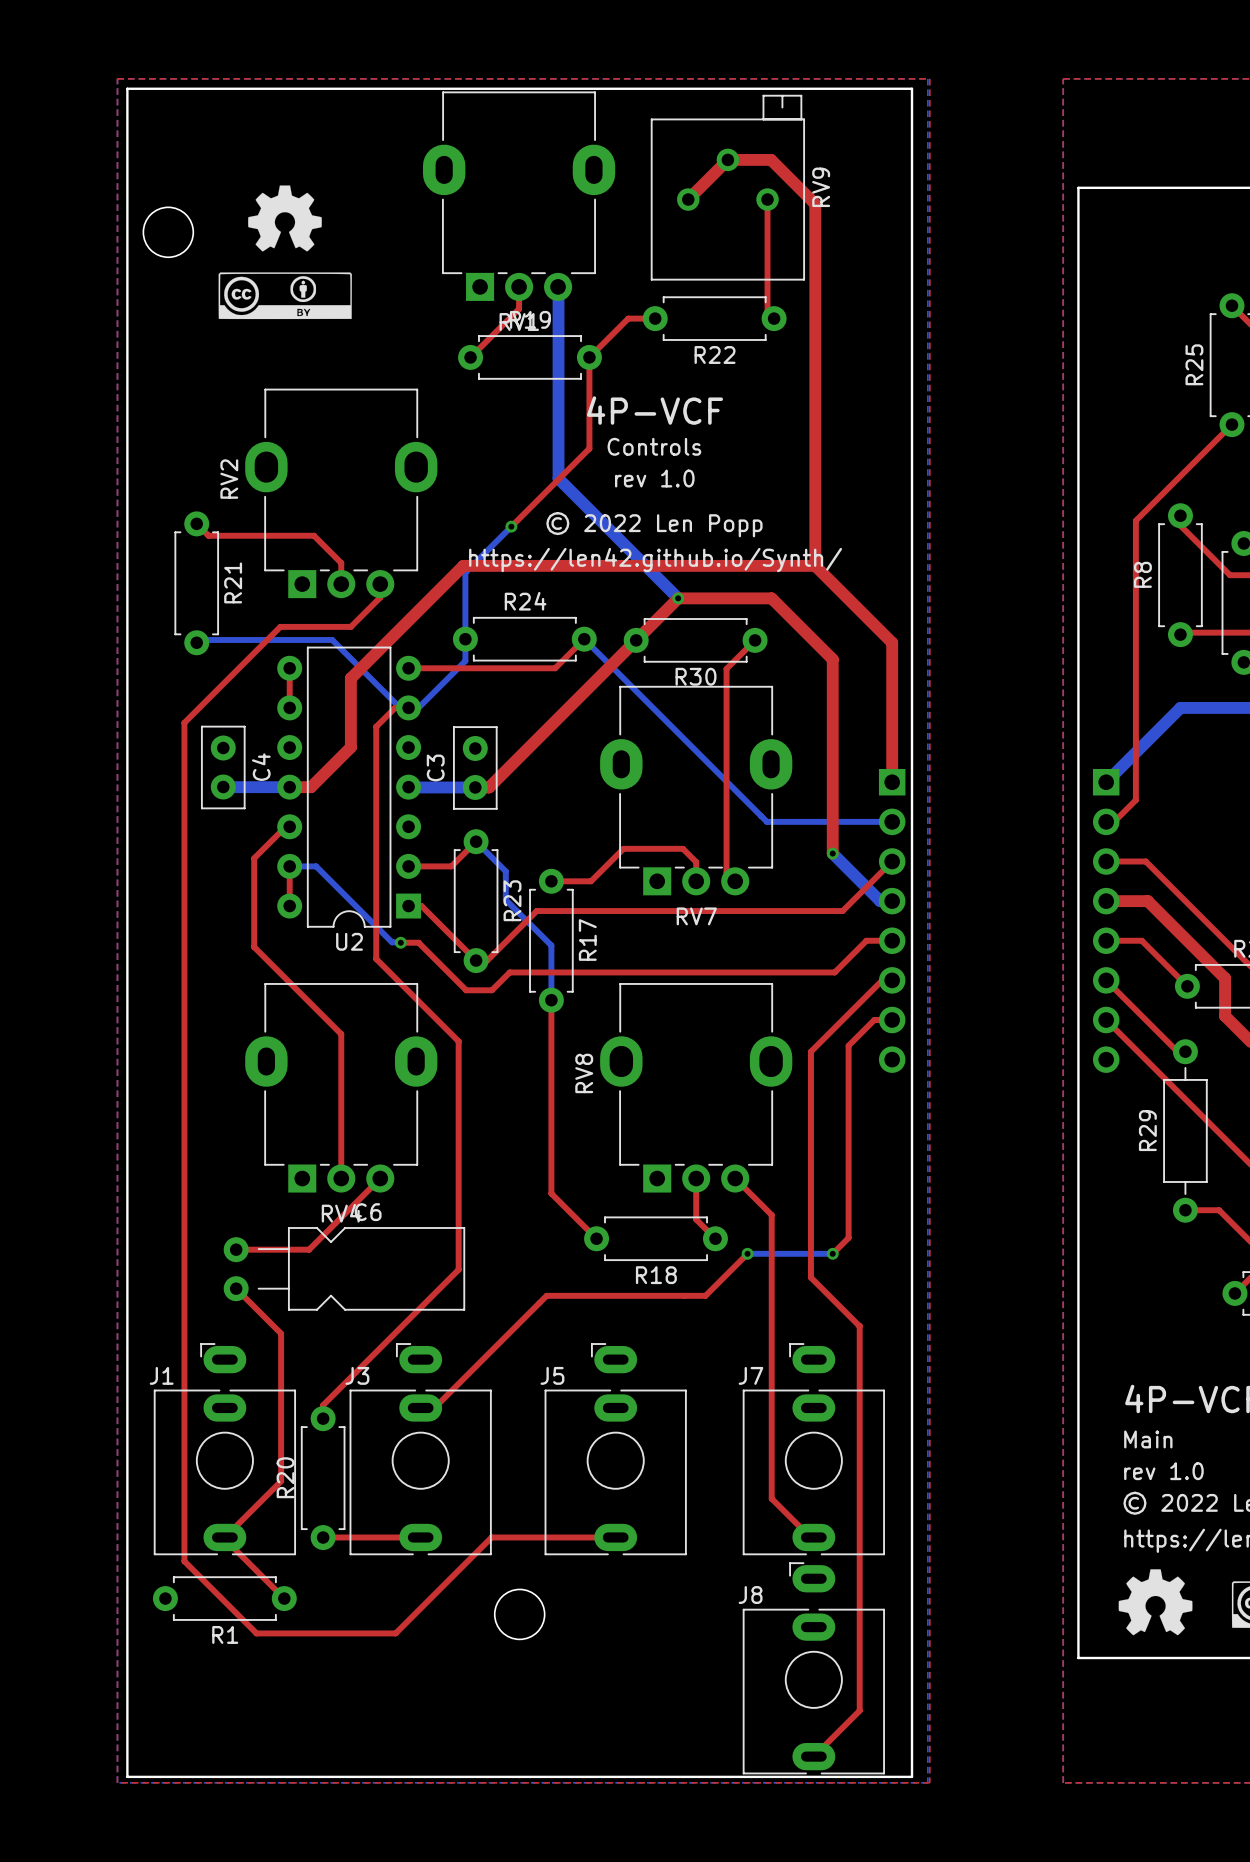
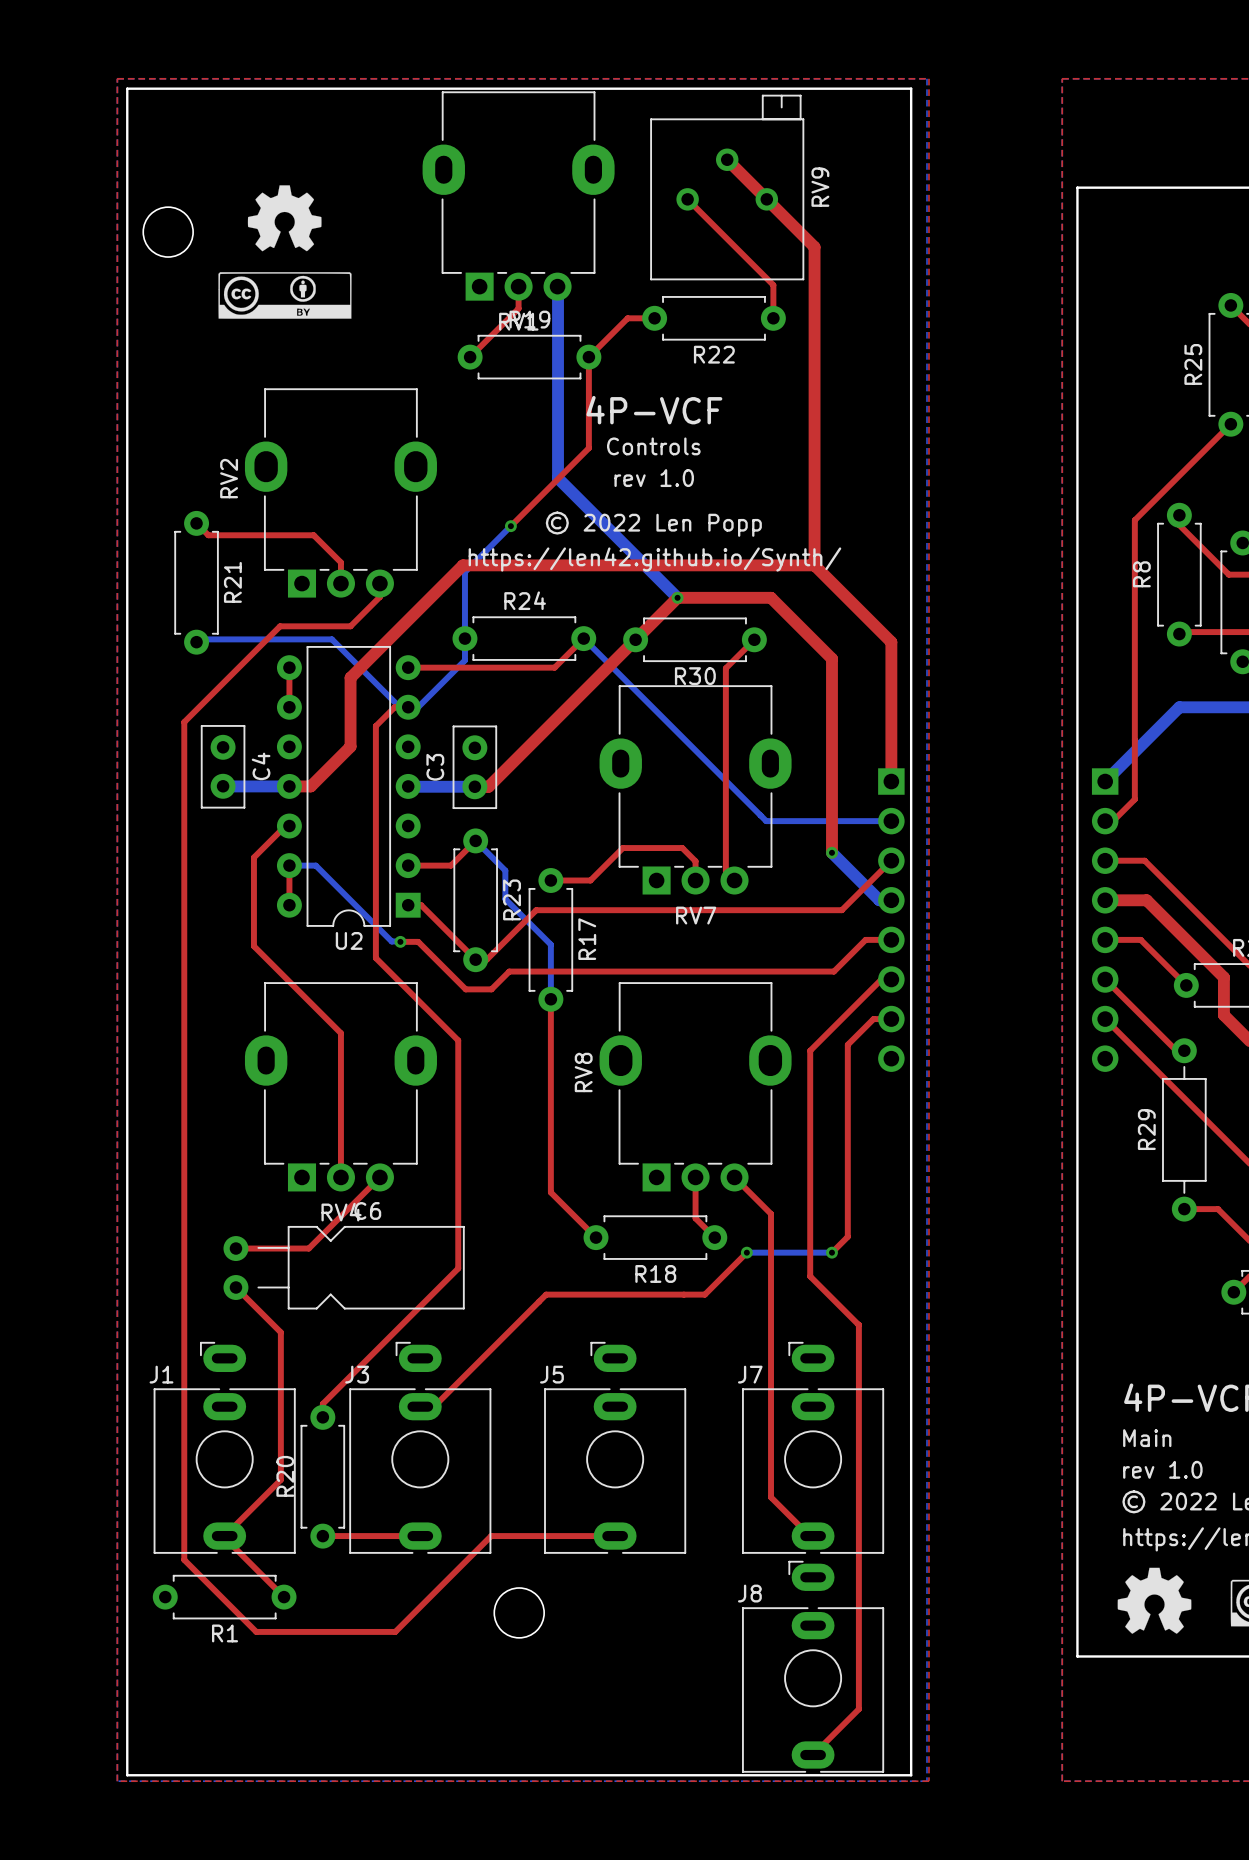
top track: (688, 199) (727, 159) (771, 159) (815, 204) (815, 247) -> (727, 159) (814, 247)
top track: (767, 199) (767, 312) (774, 318) -> (687, 199) (773, 285) (773, 318)

